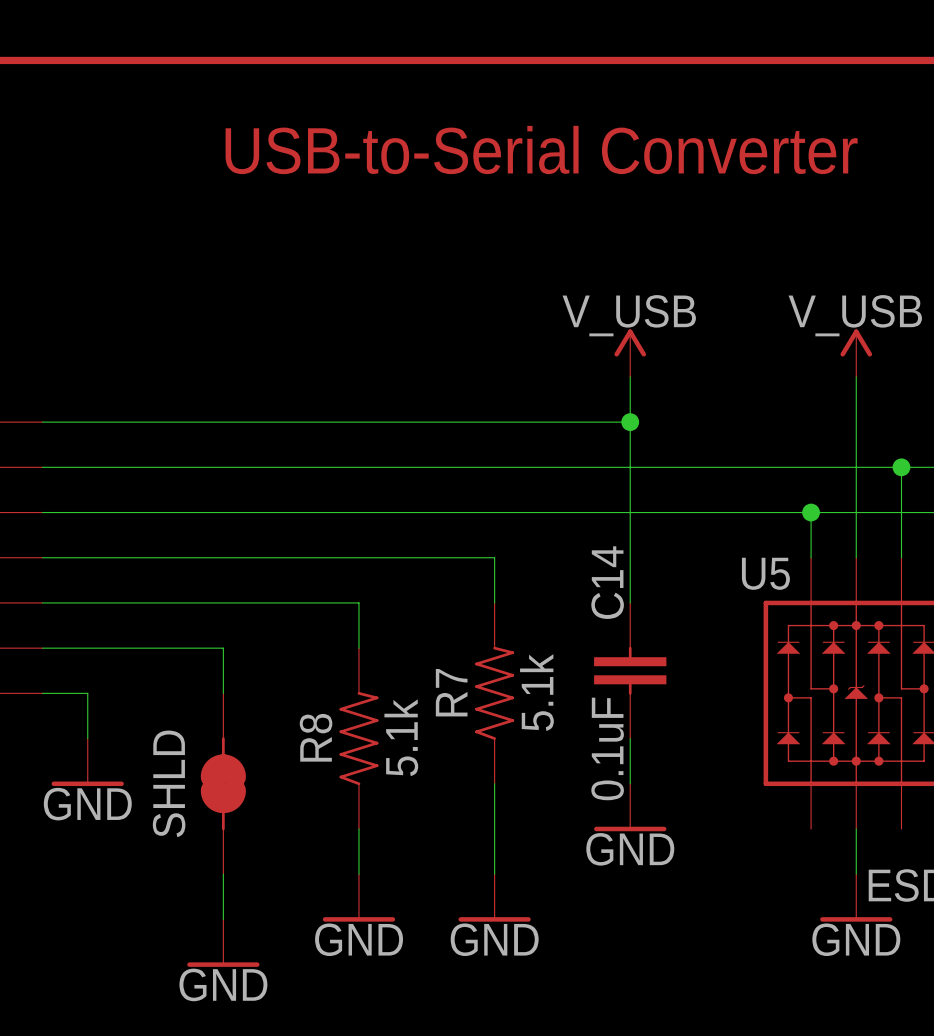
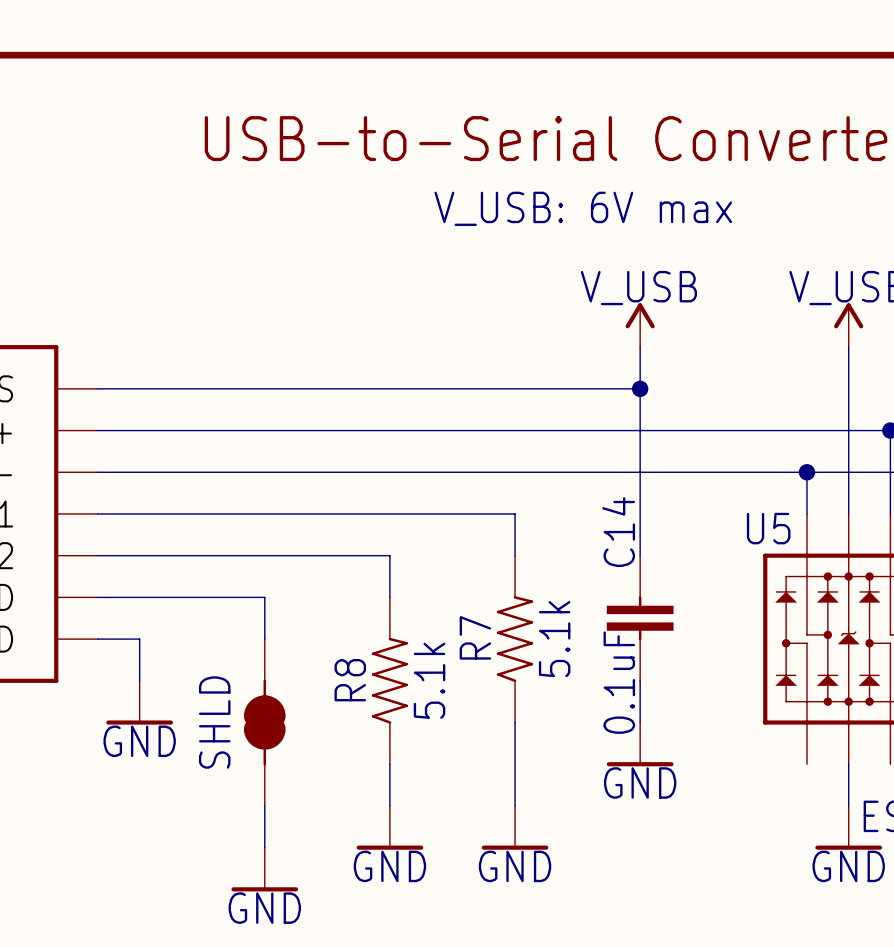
text: none -> V_USB: 6V max (583, 208)

